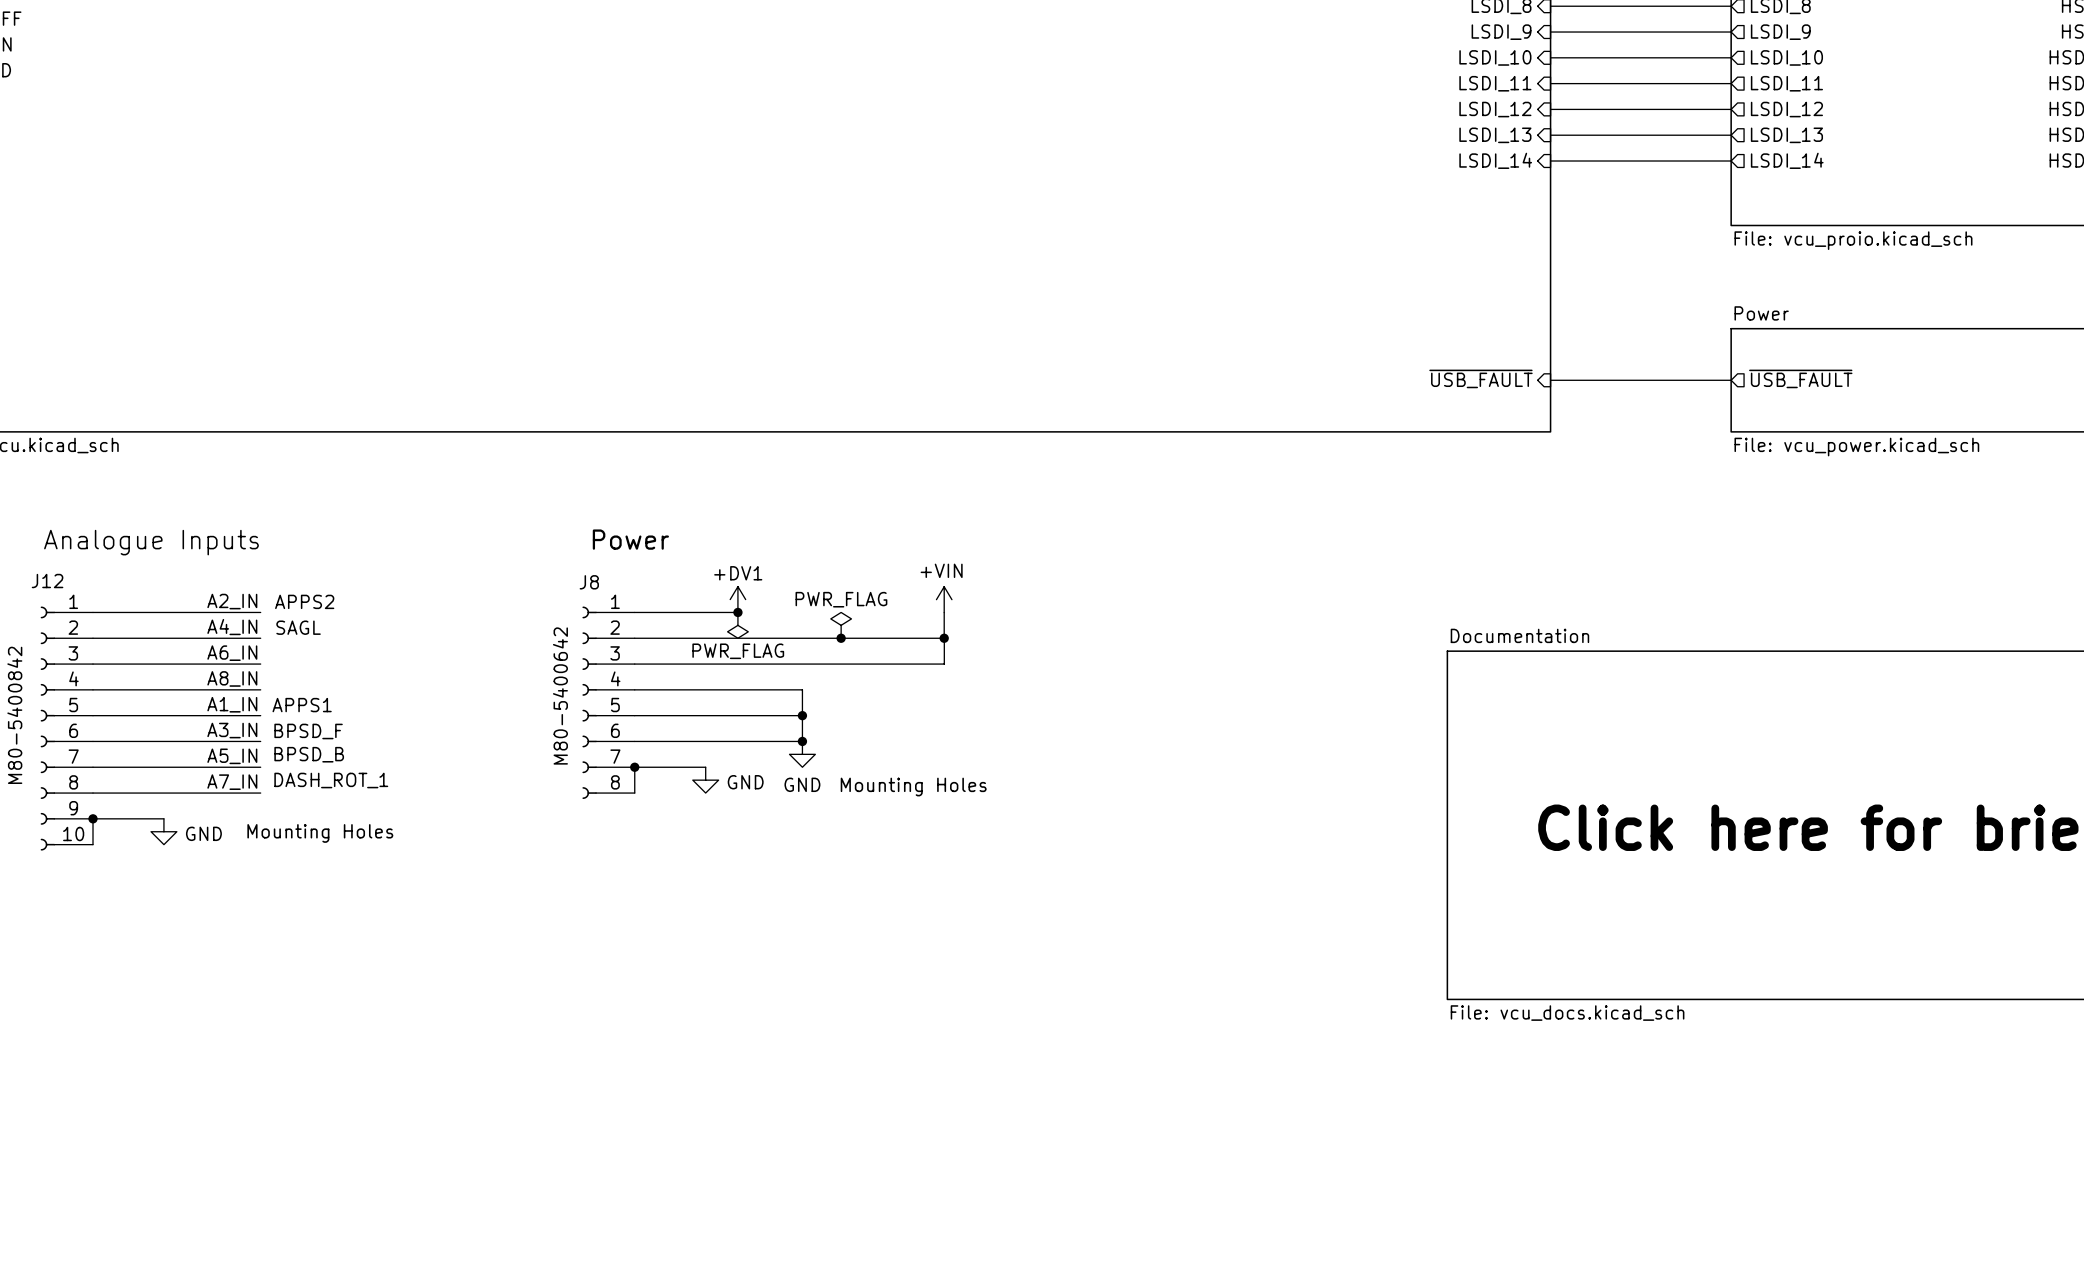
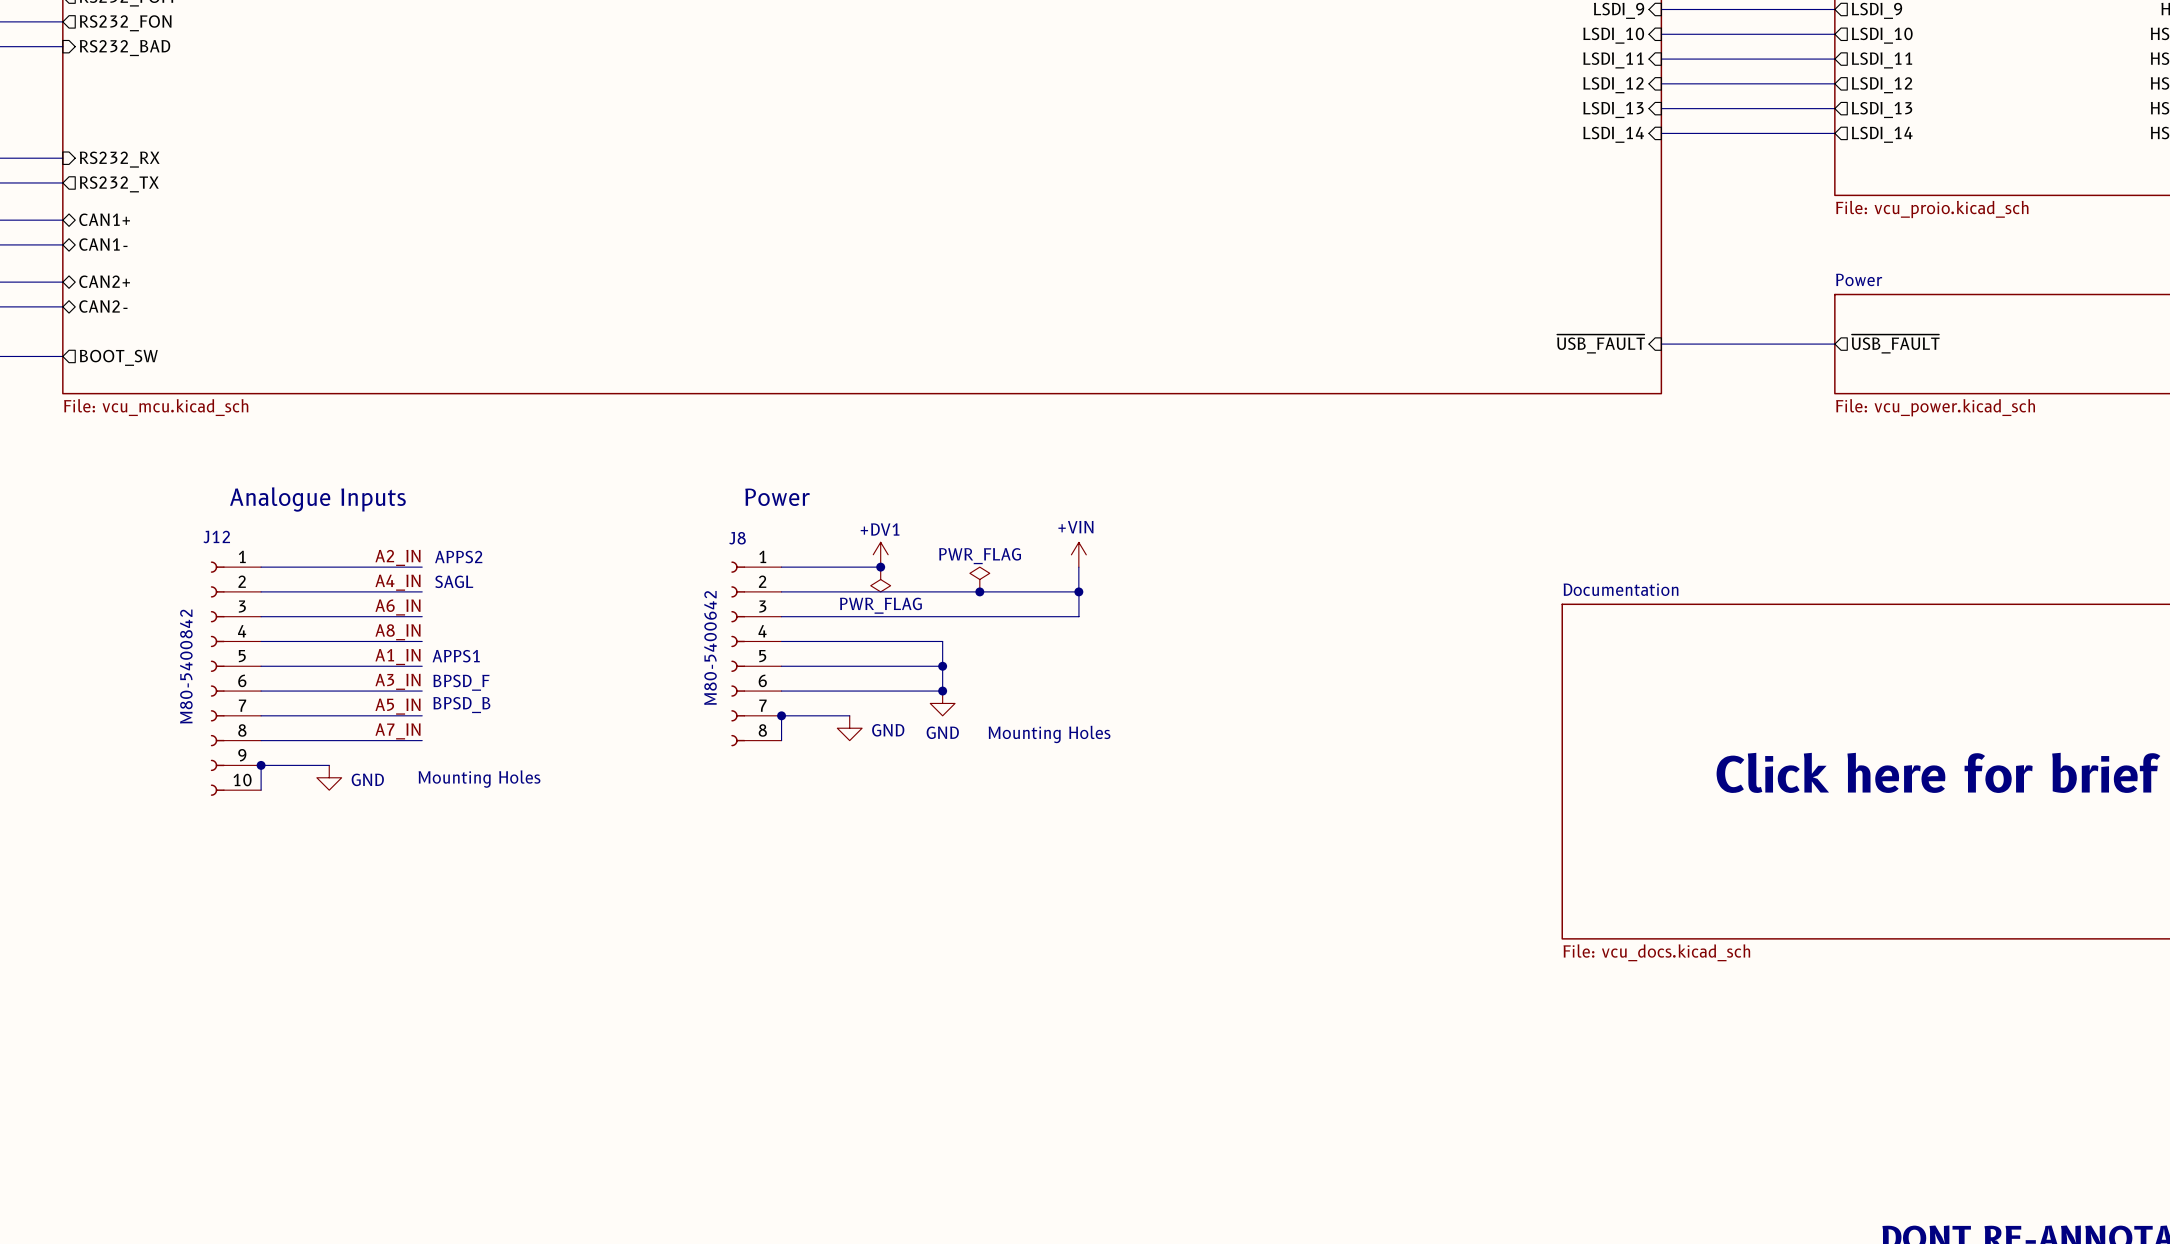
text: DASH_ROT_1 (331, 780) -> none

